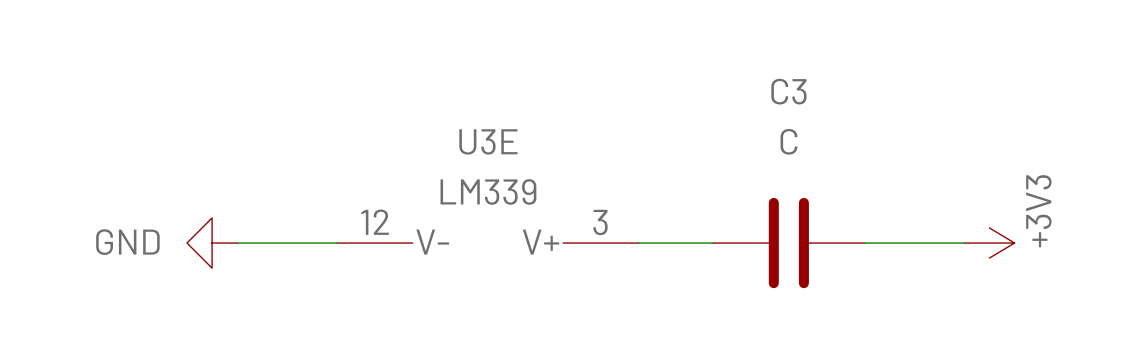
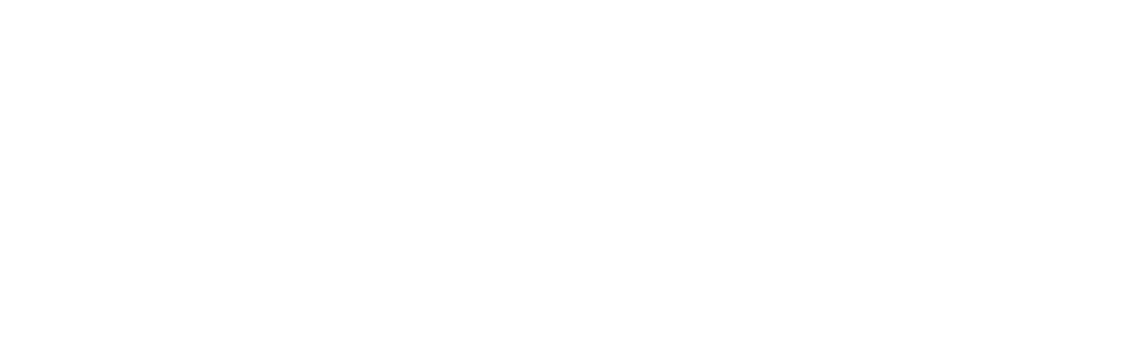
power symbol: GND (212, 243) -> none
wire: (237, 243) (337, 243) -> none
U3E: LM339 (487, 243) -> none
wire: (638, 243) (713, 243) -> none
C3: C (788, 243) -> none
wire: (864, 243) (964, 243) -> none
power symbol: +3V3 (989, 243) -> none

